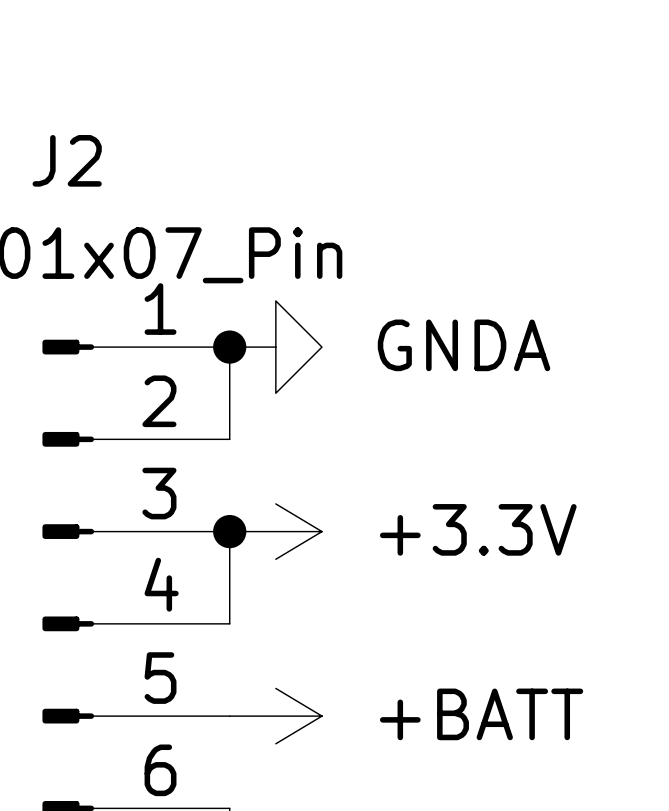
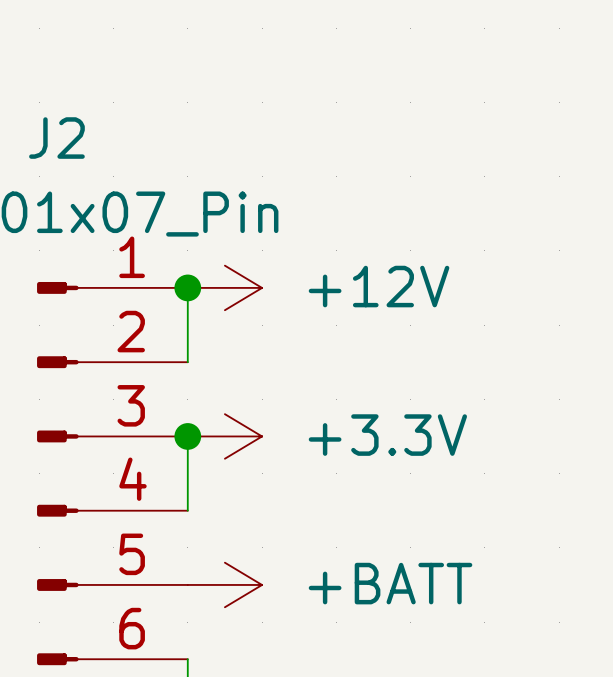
power symbol: GNDA (275, 347) -> +12V (224, 287)

